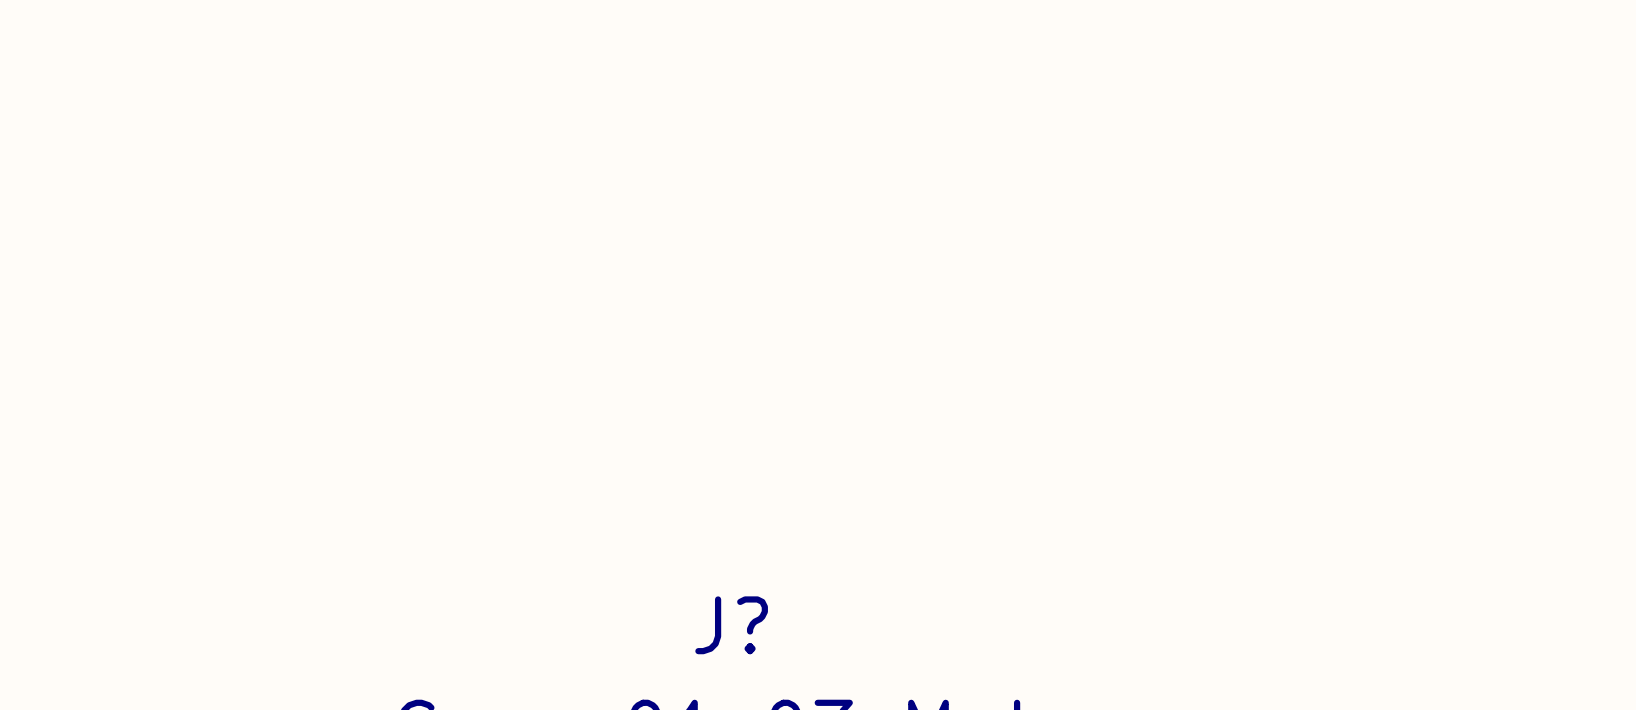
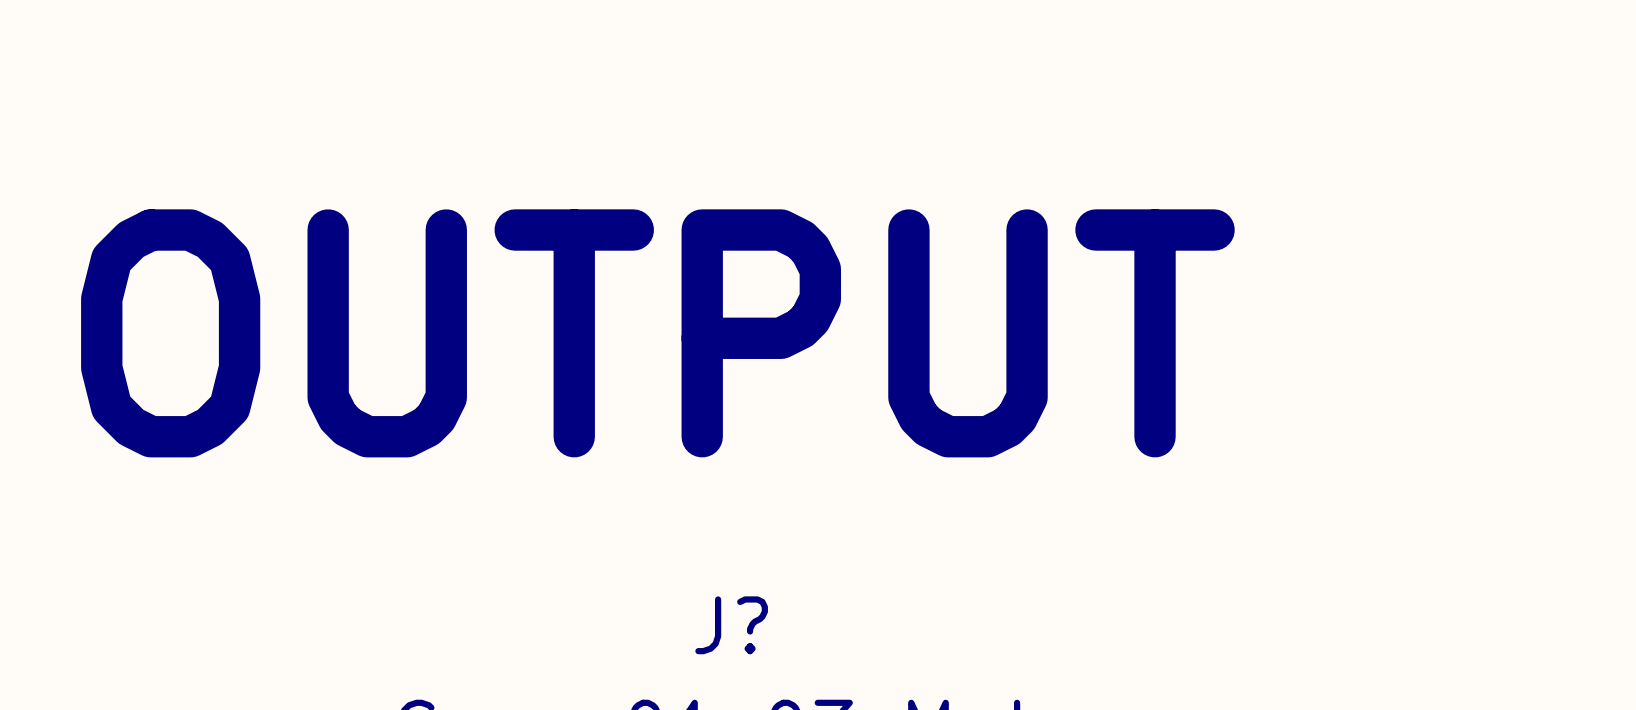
text: none -> OUTPUT (657, 333)

